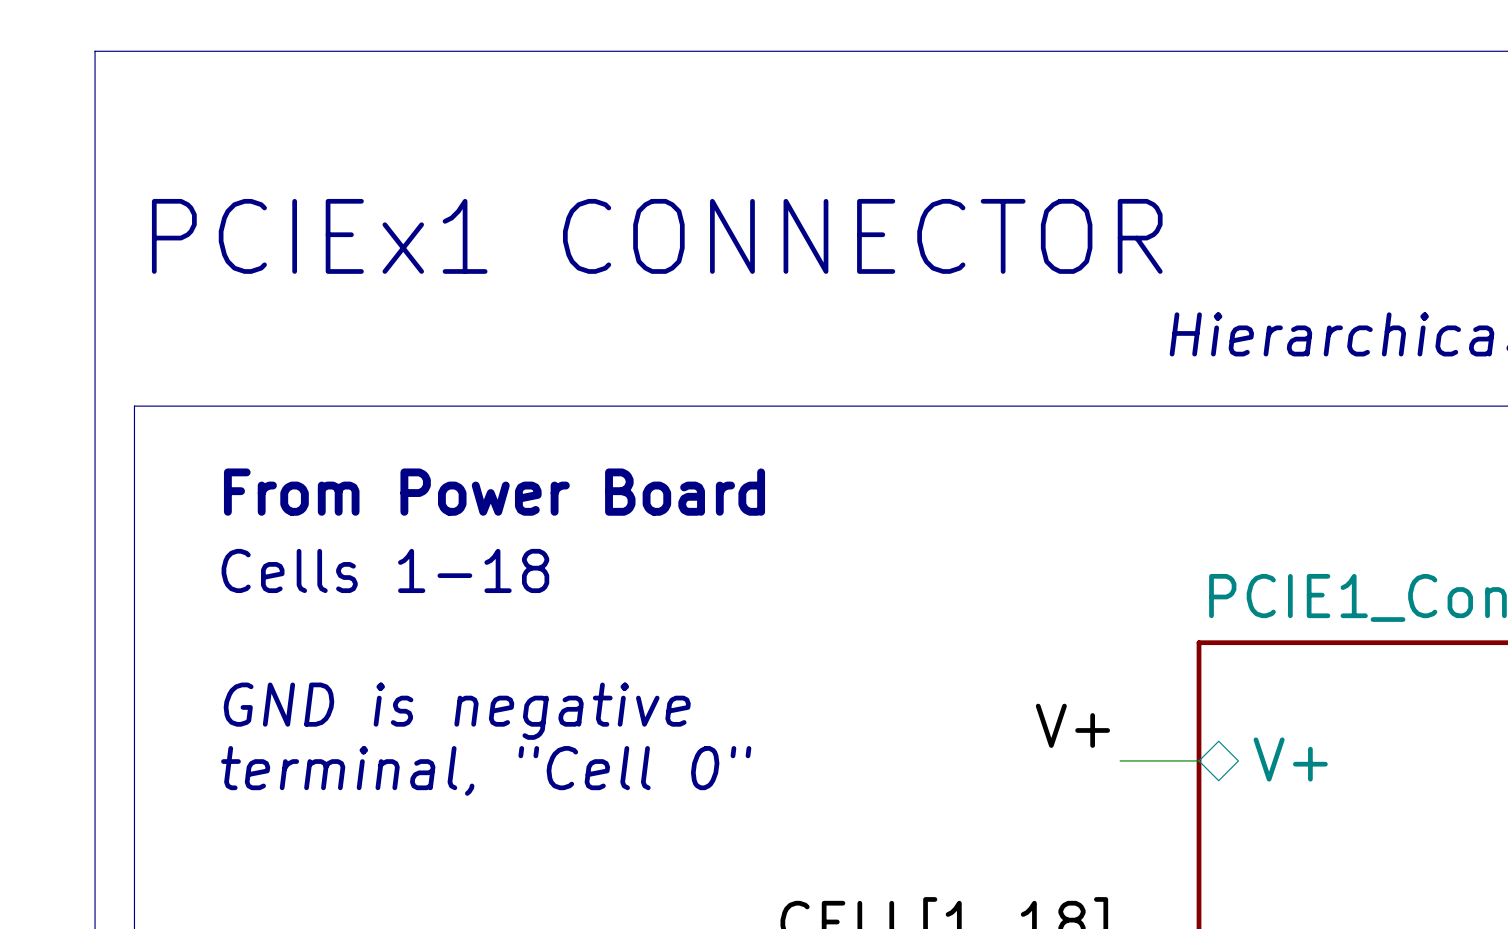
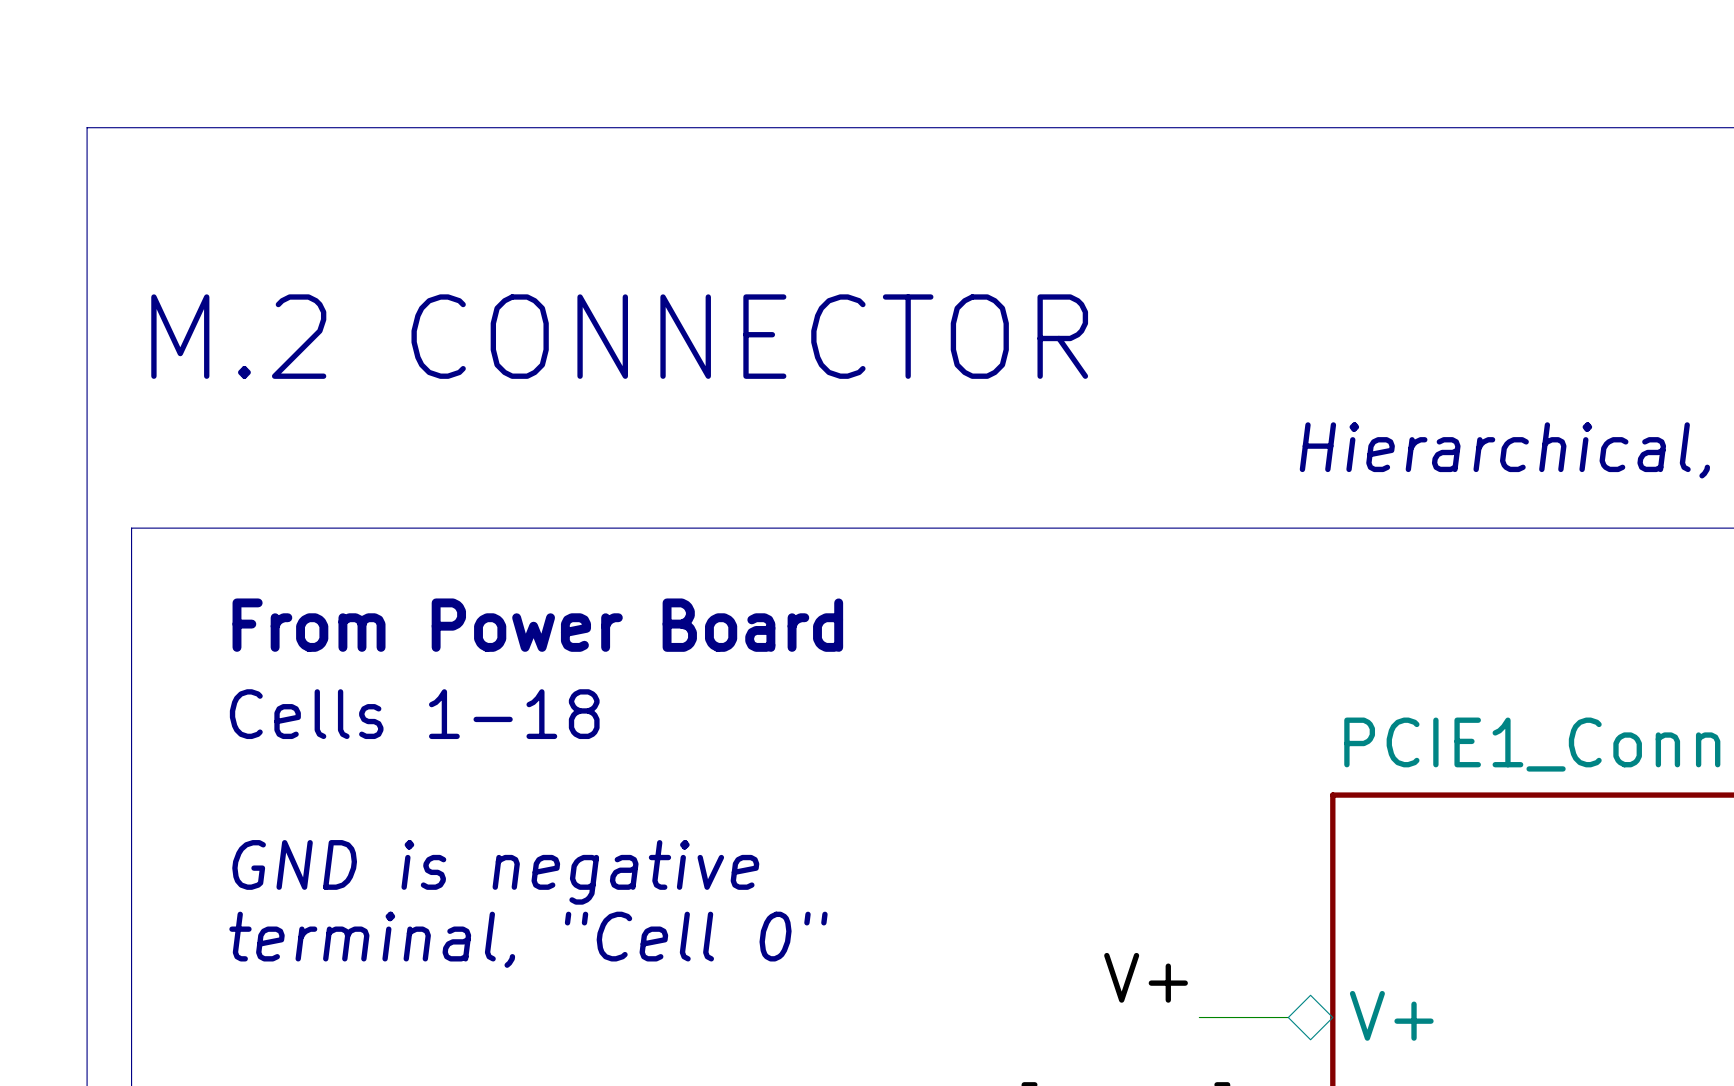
text: PCIEx1 CONNECTOR (657, 236) -> M.2 CONNECTOR (619, 336)
label position: V+ (1072, 725) -> V+ (1146, 977)
sheet pin position: V+ (1290, 759) -> V+ (1391, 1015)
wire: (1120, 760) (1199, 760) -> (1199, 1017) (1288, 1017)

